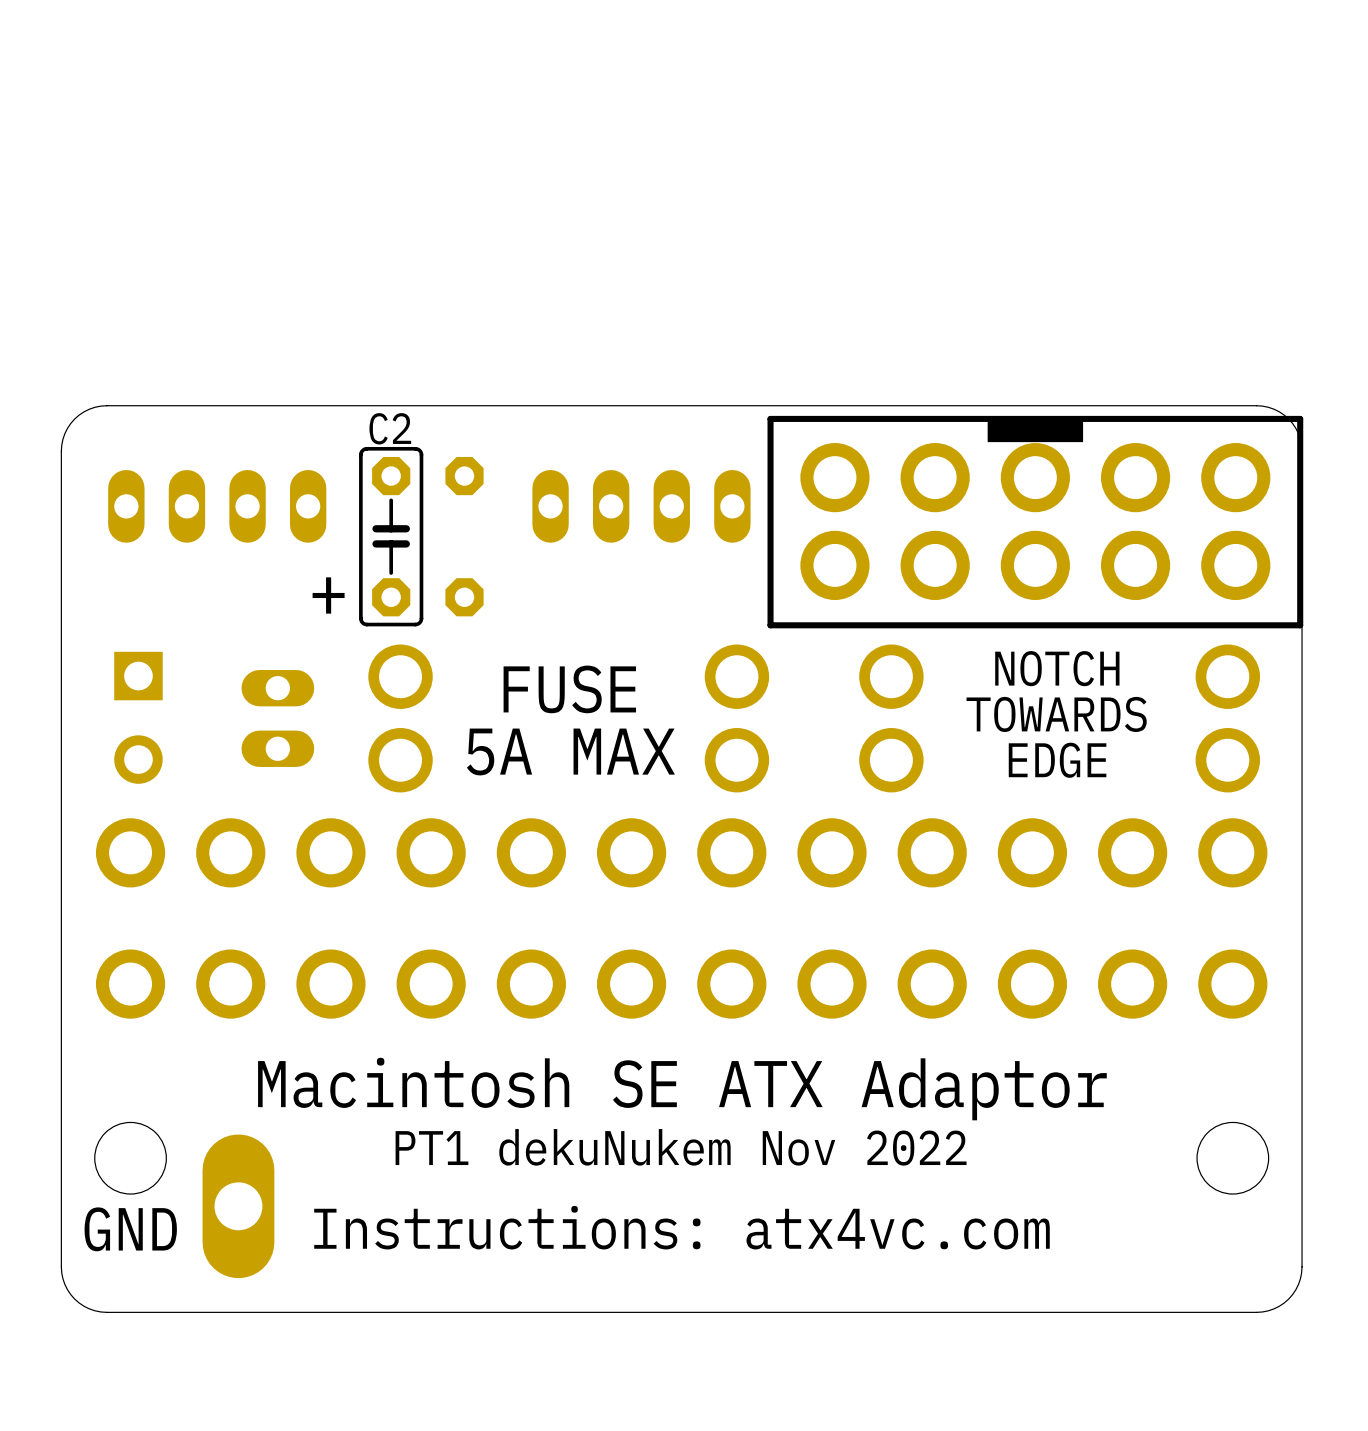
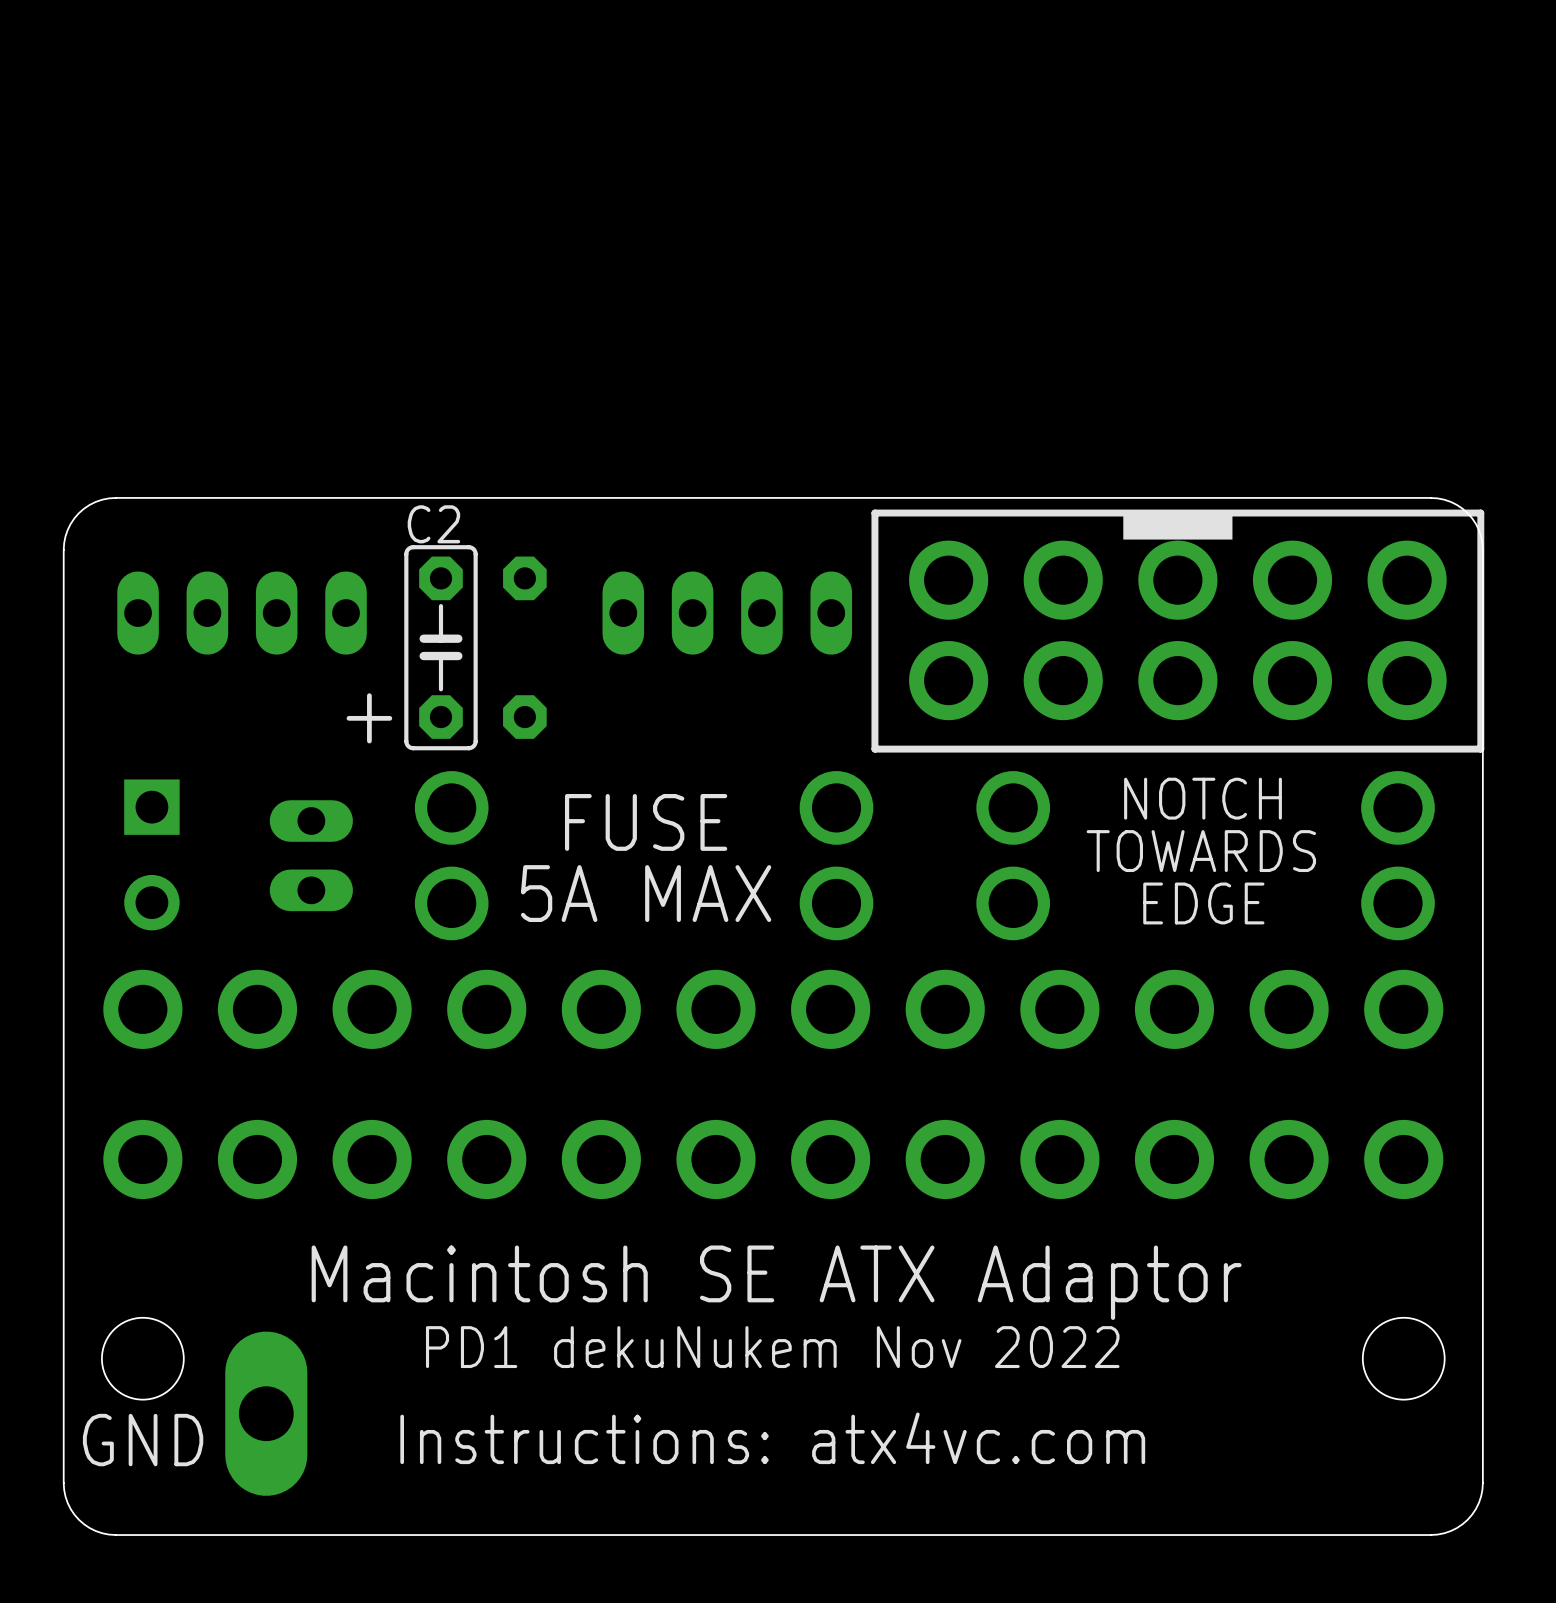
text: PT1 dekuNukem Nov 2022 (681, 1147) -> PD1 dekuNukem Nov 2022 (772, 1347)

